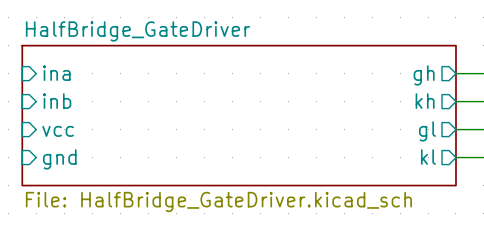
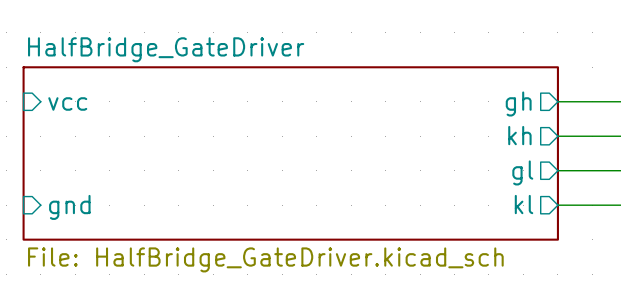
sheet pin: ina (56, 73) -> vcc (67, 103)
sheet pin: inb (57, 101) -> none
sheet pin: vcc (58, 131) -> none

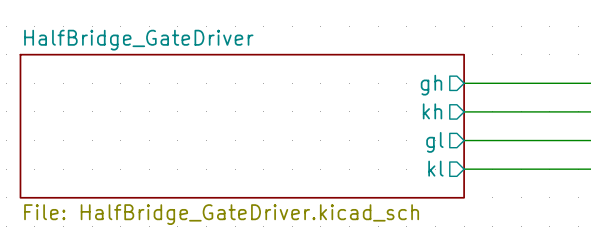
sheet pin: vcc (67, 103) -> none
sheet pin: gnd (69, 207) -> none

